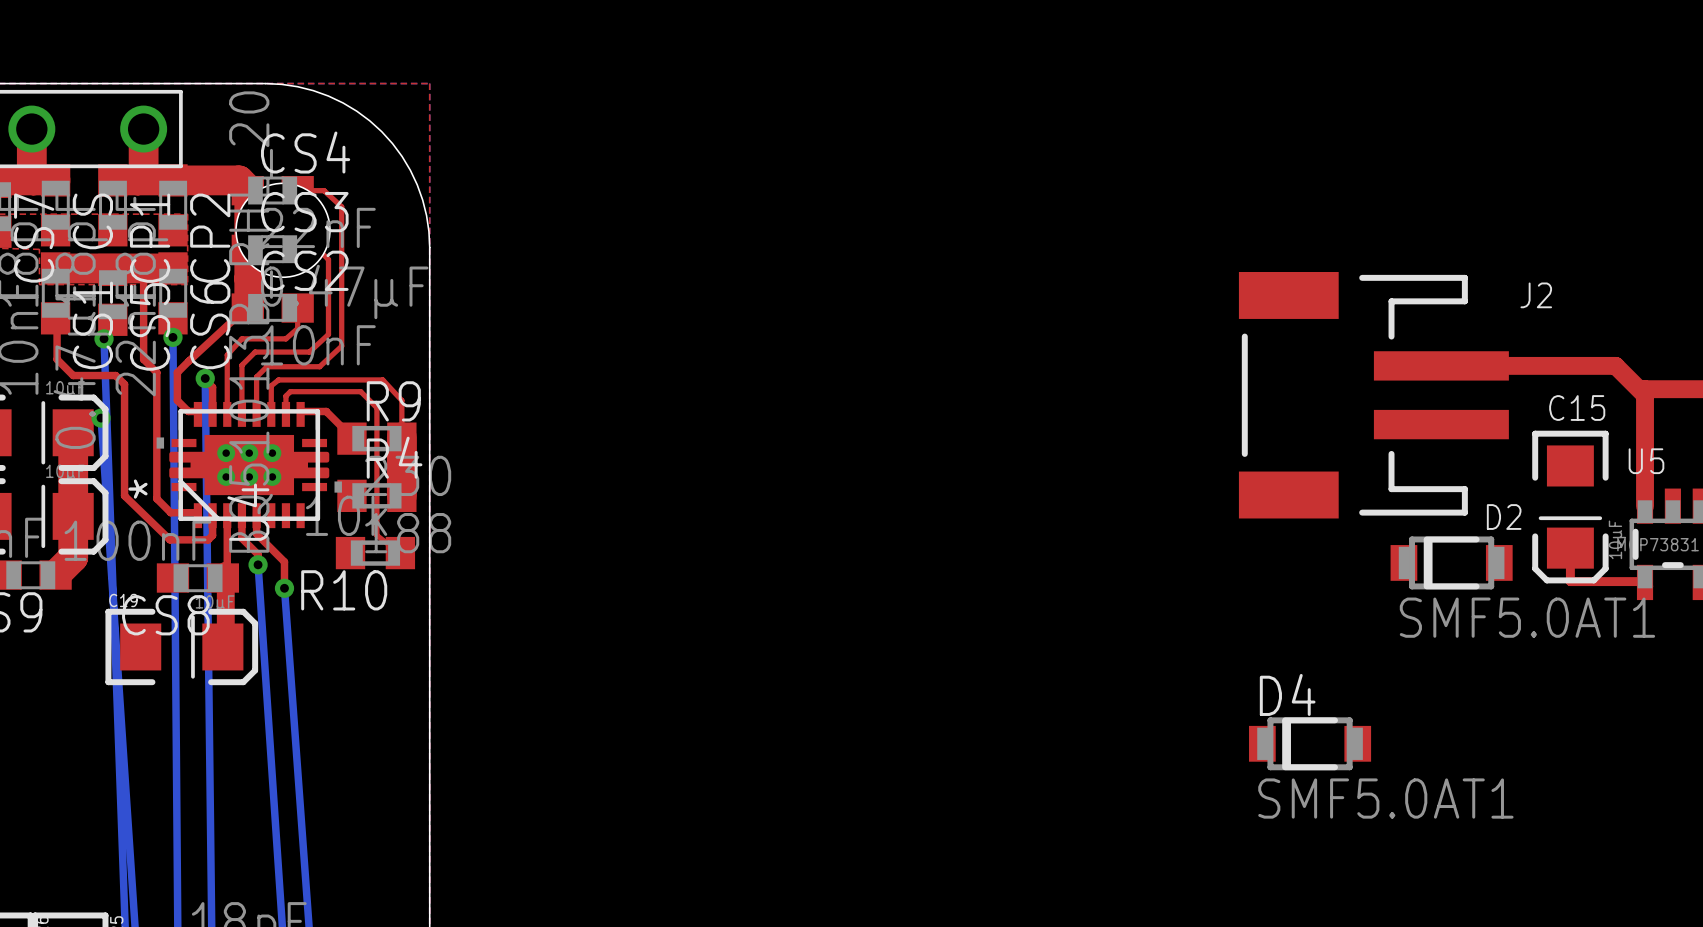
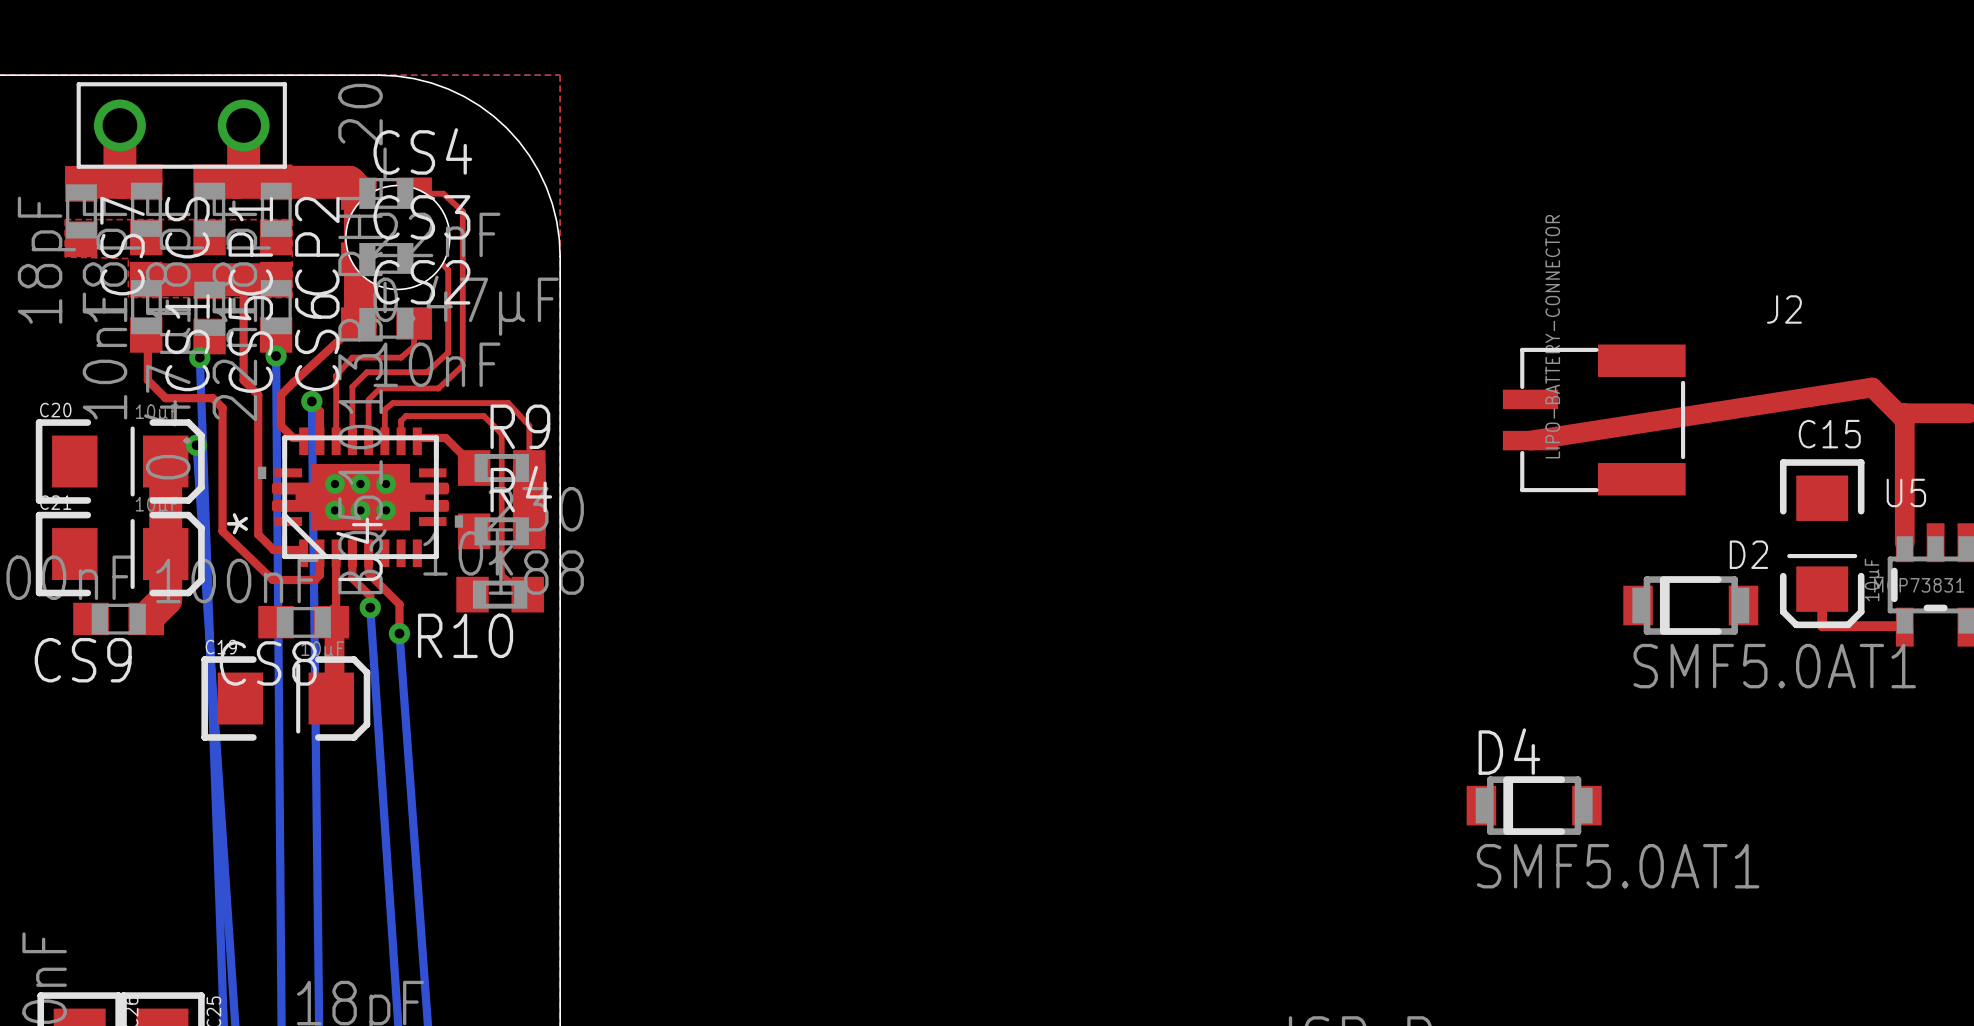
J2 footprint: [1238, 272, 1509, 519] -> [1502, 344, 1686, 496]
J2 value: none -> LIPO-BATTERY-CONNECTOR (1552, 336)
top track: (1441, 365) (1615, 365) -> (1530, 440) (1872, 387)

